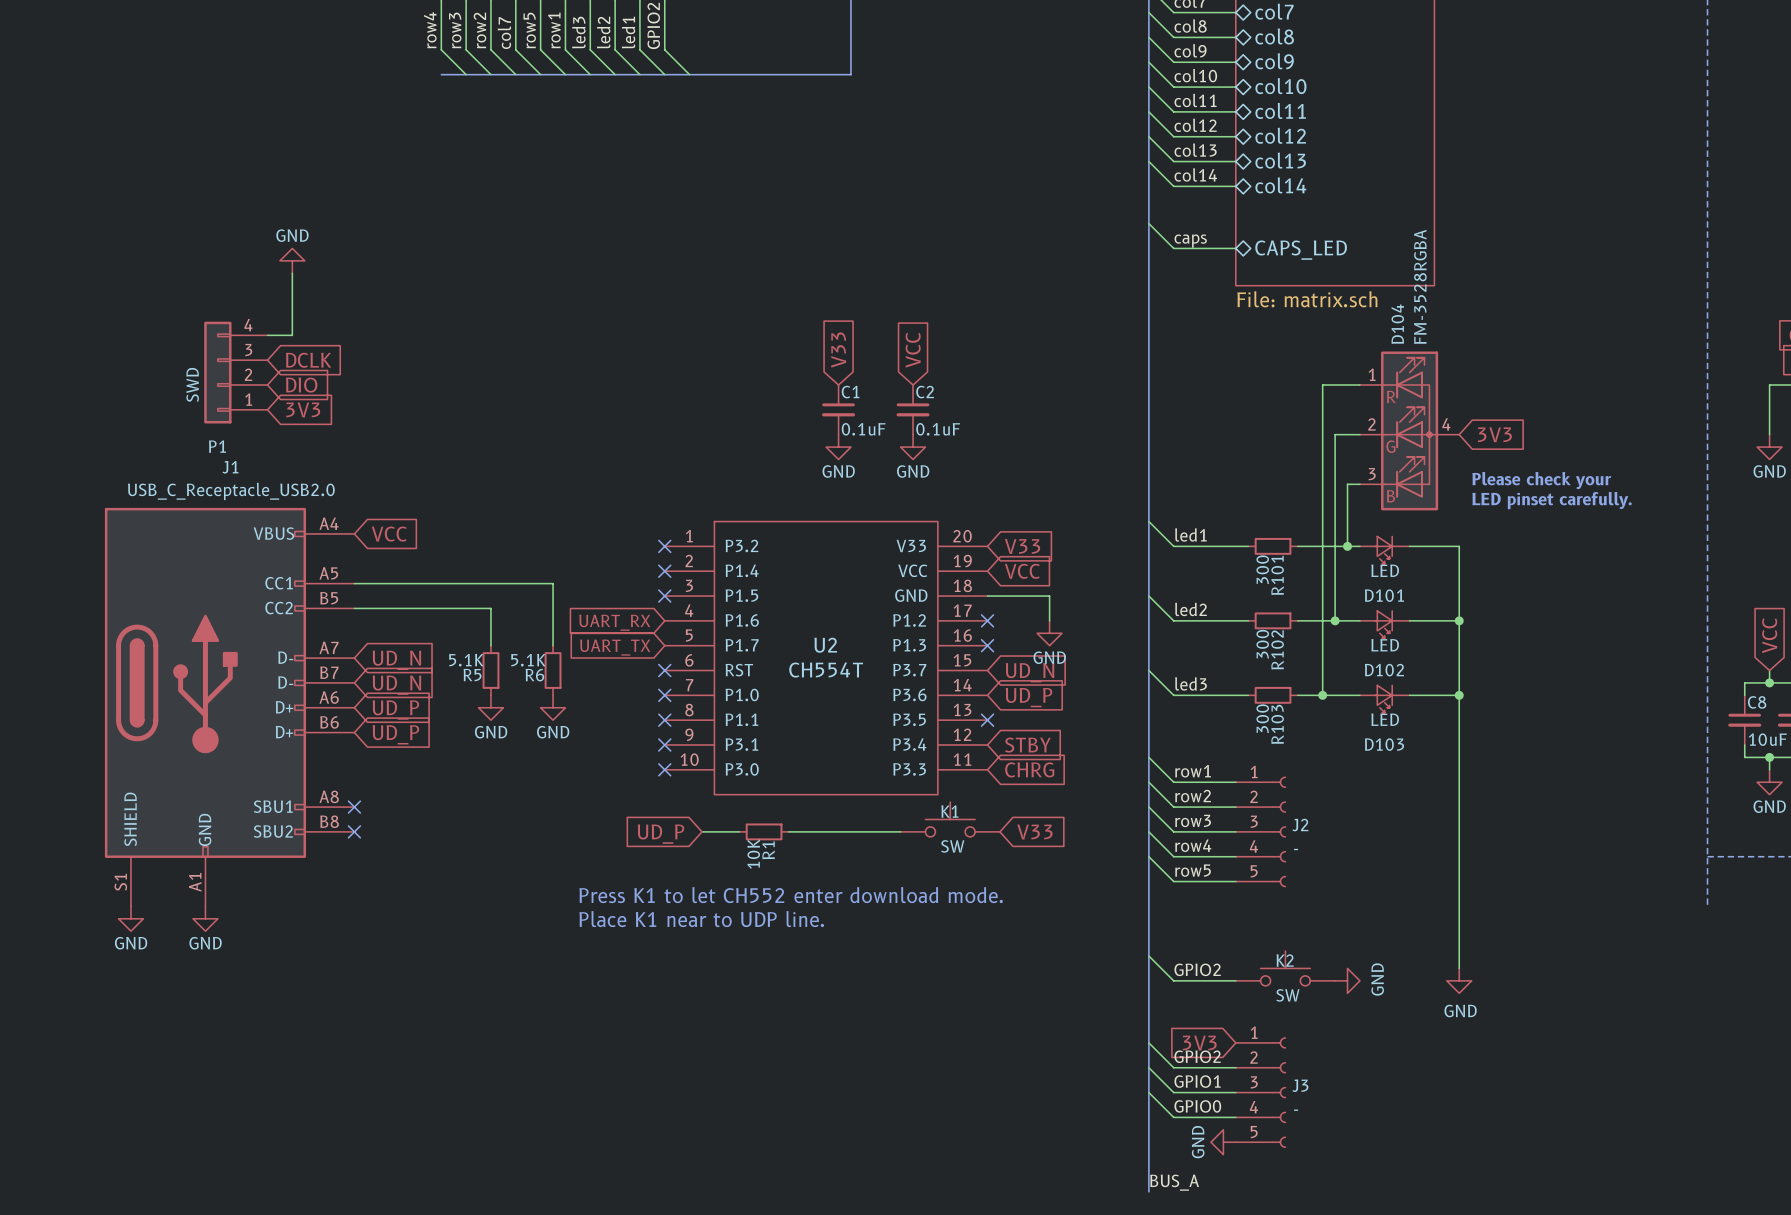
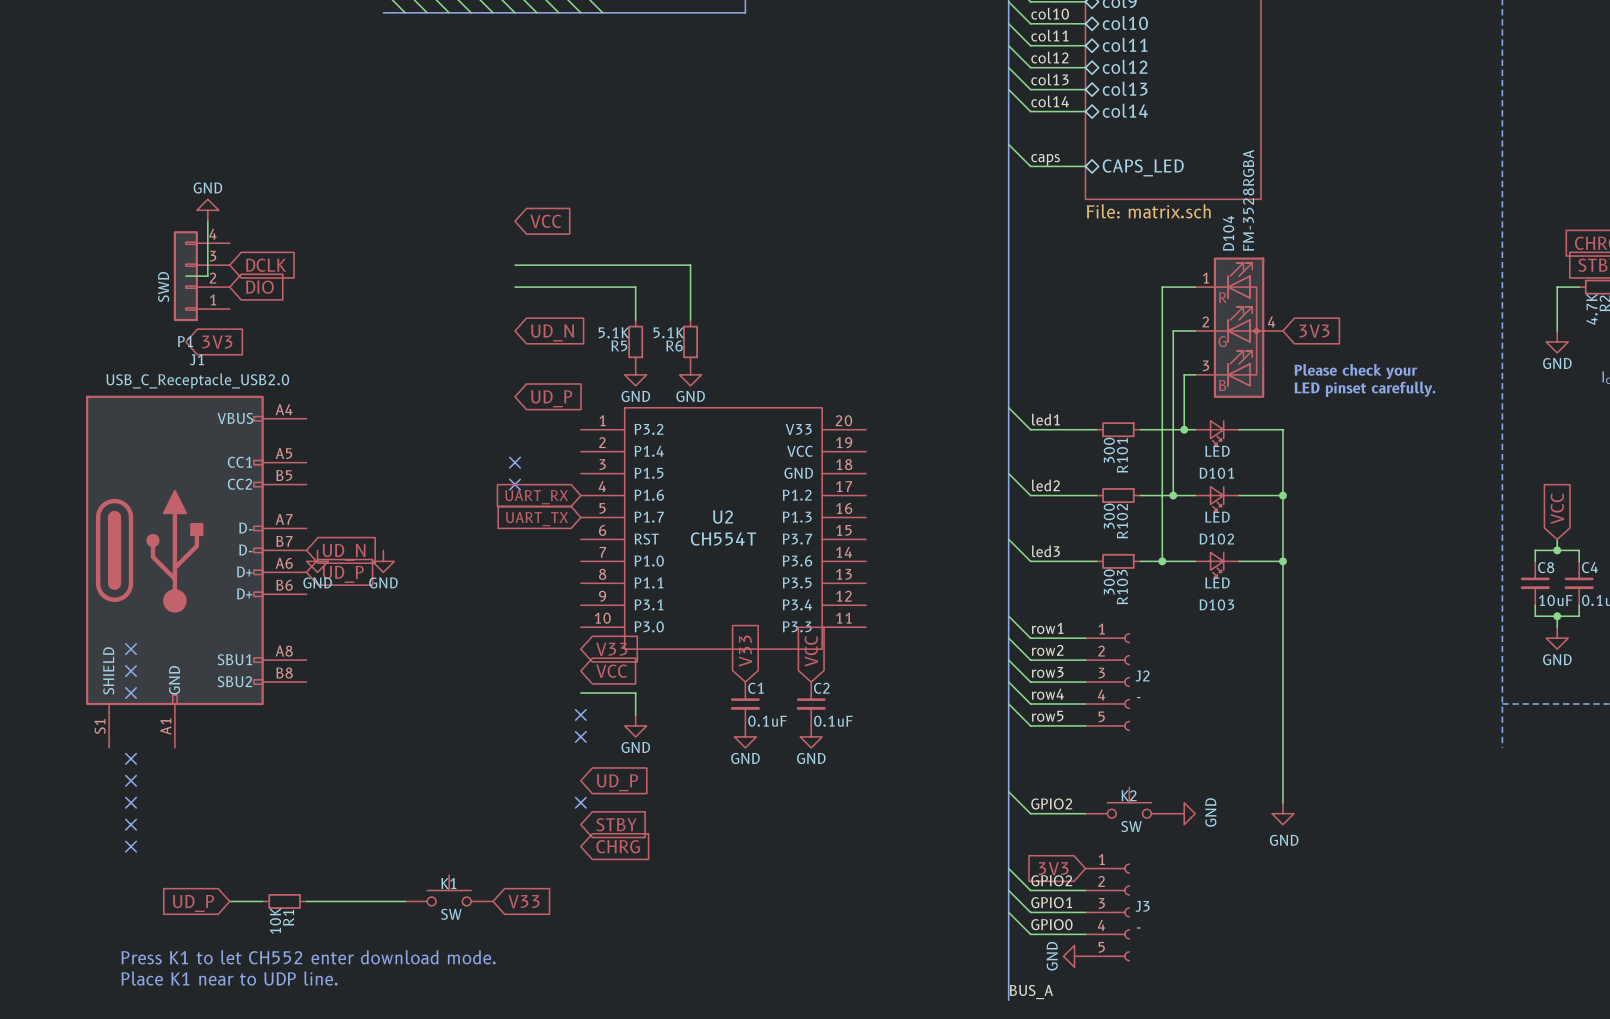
power symbol position: GND (292, 260) -> GND (207, 210)
wire: (292, 273) (292, 335) (267, 335) -> (207, 221) (207, 276) (185, 276)
global label: none -> VCC (545, 221)
global label: V33 (838, 349) -> none
global label: VCC (913, 350) -> none
wire: none -> (515, 265) (690, 265) (690, 320)
wire: none -> (515, 287) (635, 287) (635, 320)
global label position: 3V3 (303, 409) -> 3V3 (217, 342)
C1 position: (838, 409) -> (745, 703)
C2 position: (913, 409) -> (811, 703)
global label: none -> UD_N (552, 332)
power symbol: GND (838, 447) -> none
power symbol: GND (913, 447) -> none
power symbol: none -> GND (635, 374)
power symbol: none -> GND (690, 374)
global label: none -> UD_P (551, 398)
global label: VCC (389, 534) -> none
no-connect mark: (664, 546) -> none
global label: V33 (1022, 546) -> none
no-connect mark: (664, 571) -> none
global label: VCC (1022, 571) -> none
wire: (354, 583) (553, 583) (553, 645) -> none
no-connect mark: none -> (515, 462)
no-connect mark: (664, 596) -> none
wire: (987, 596) (1049, 596) (1049, 620) -> none
wire: (354, 608) (490, 608) (490, 645) -> none
no-connect mark: none -> (515, 484)
no-connect mark: (987, 620) -> none
power symbol: GND (1049, 633) -> none
no-connect mark: (987, 645) -> none
global label: UD_N (396, 660) -> none
R5 position: (490, 670) -> (635, 341)
R6 position: (553, 670) -> (690, 341)
no-connect mark: (664, 670) -> none
global label: UD_N (1029, 672) -> none
power symbol: none -> GND (317, 561)
no-connect mark: (664, 695) -> none
global label: UD_P (1028, 697) -> none
power symbol position: GND (490, 707) -> GND (383, 561)
power symbol: GND (553, 707) -> none
no-connect mark: (664, 720) -> none
no-connect mark: (987, 720) -> none
global label: UD_P (395, 734) -> none
no-connect mark: (664, 745) -> none
global label: STBY (1027, 745) -> none
no-connect mark: (664, 769) -> none
global label: CHRG (1029, 769) -> none
no-connect mark: none -> (131, 649)
global label: none -> V33 (611, 649)
global label: none -> VCC (811, 651)
no-connect mark: (354, 807) -> none
no-connect mark: none -> (131, 671)
global label: none -> VCC (611, 671)
K1 position: (950, 819) -> (449, 890)
no-connect mark: (354, 831) -> none
wire: (702, 831) (739, 831) -> none
R1 position: (764, 831) -> (284, 901)
wire: (788, 831) (900, 831) -> none
global label rotation: 0° (1034, 831) -> 90° counterclockwise (745, 651)
global label position: V33 (1034, 831) -> V33 (745, 651)
global label rotation: 0° (660, 834) -> 180° (617, 782)
global label position: UD_P (660, 834) -> UD_P (617, 782)
no-connect mark: none -> (131, 693)
wire: none -> (580, 693) (635, 693) (635, 714)
no-connect mark: none -> (580, 714)
power symbol: none -> GND (635, 725)
no-connect mark: none -> (580, 736)
power symbol: none -> GND (745, 736)
power symbol: none -> GND (811, 736)
text: Press K1 to let CH552 enter download mode. (791, 895) -> none
power symbol: GND (130, 918) -> none
no-connect mark: none -> (131, 758)
power symbol: GND (205, 918) -> none
text: Place K1 near to UDP line. (701, 919) -> none
no-connect mark: none -> (131, 780)
no-connect mark: none -> (131, 802)
no-connect mark: none -> (580, 802)
no-connect mark: none -> (131, 824)
global label: none -> STBY (616, 824)
no-connect mark: none -> (131, 846)
global label: none -> CHRG (618, 846)
wire: none -> (229, 901) (262, 901)
wire: none -> (306, 901) (405, 901)
global label: none -> V33 (524, 901)
global label: none -> UD_P (193, 903)
text: none -> Press K1 to let CH552 enter download mode. (308, 957)
text: none -> Place K1 near to UDP line. (229, 978)

